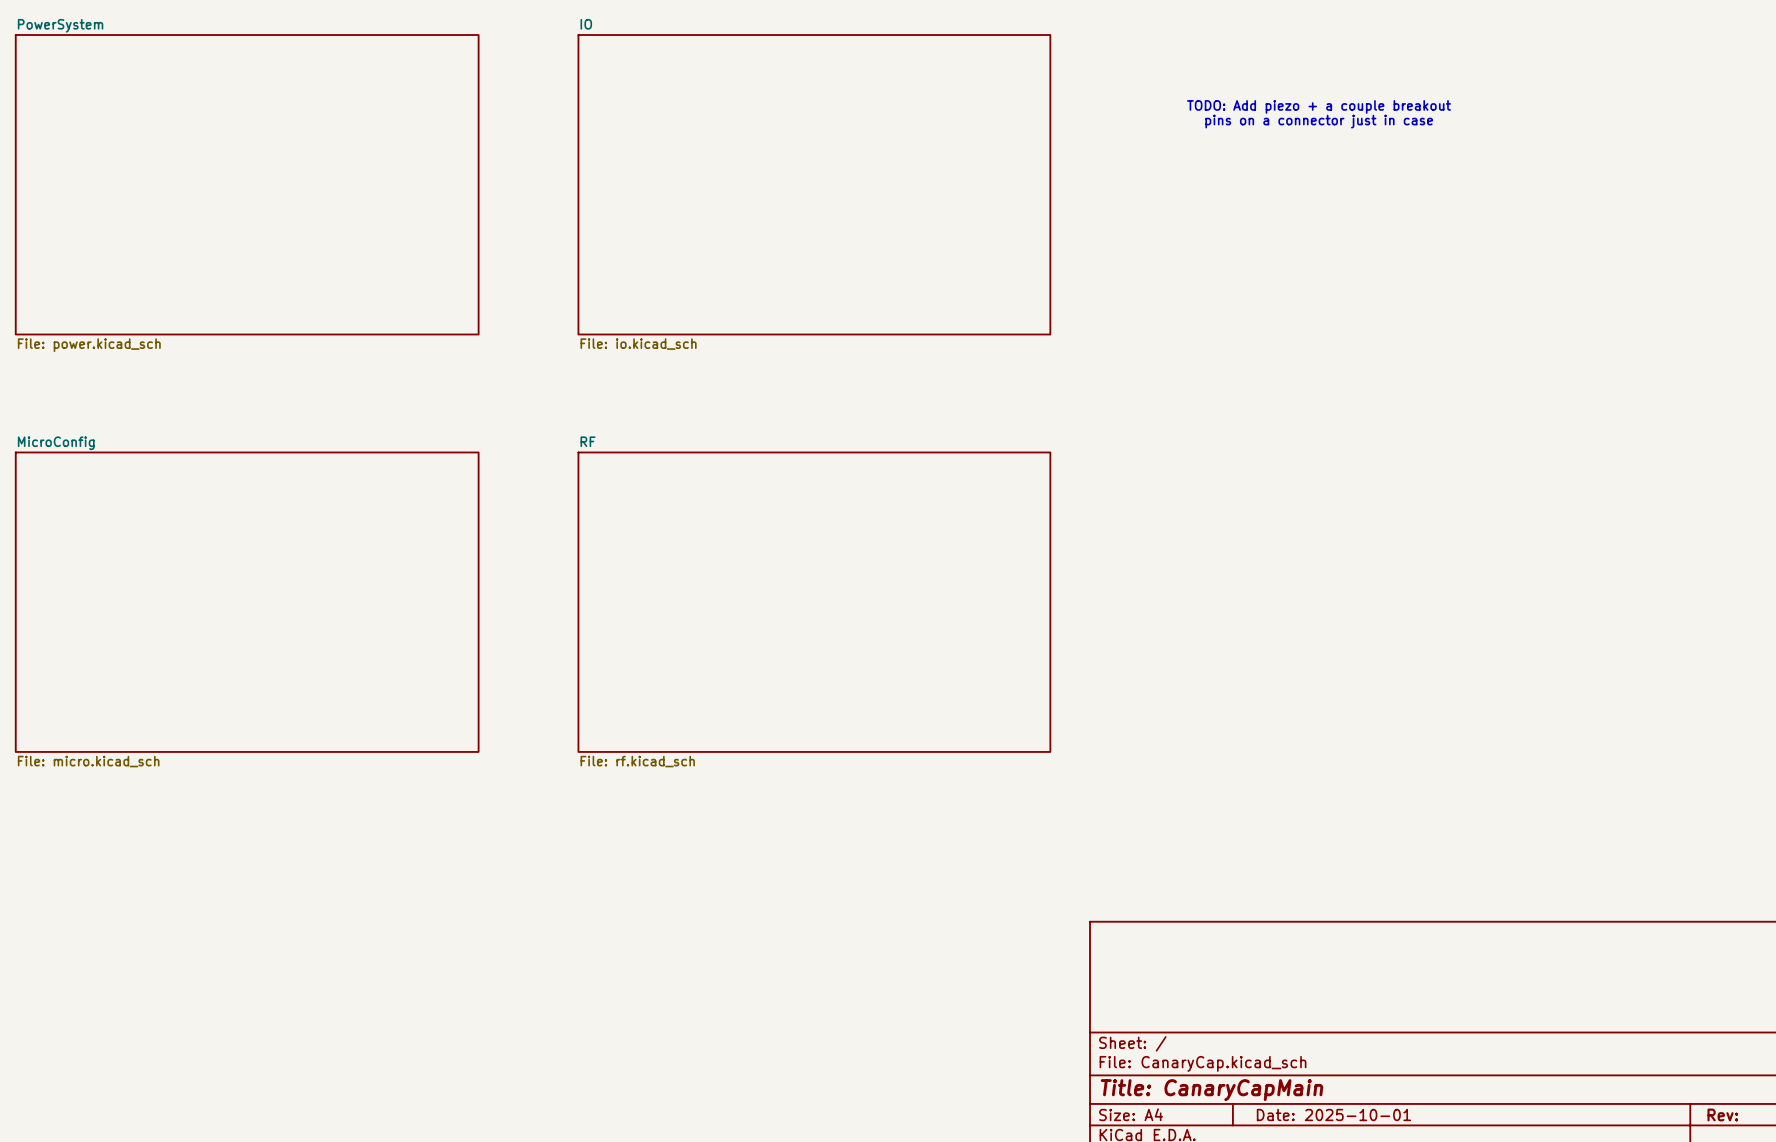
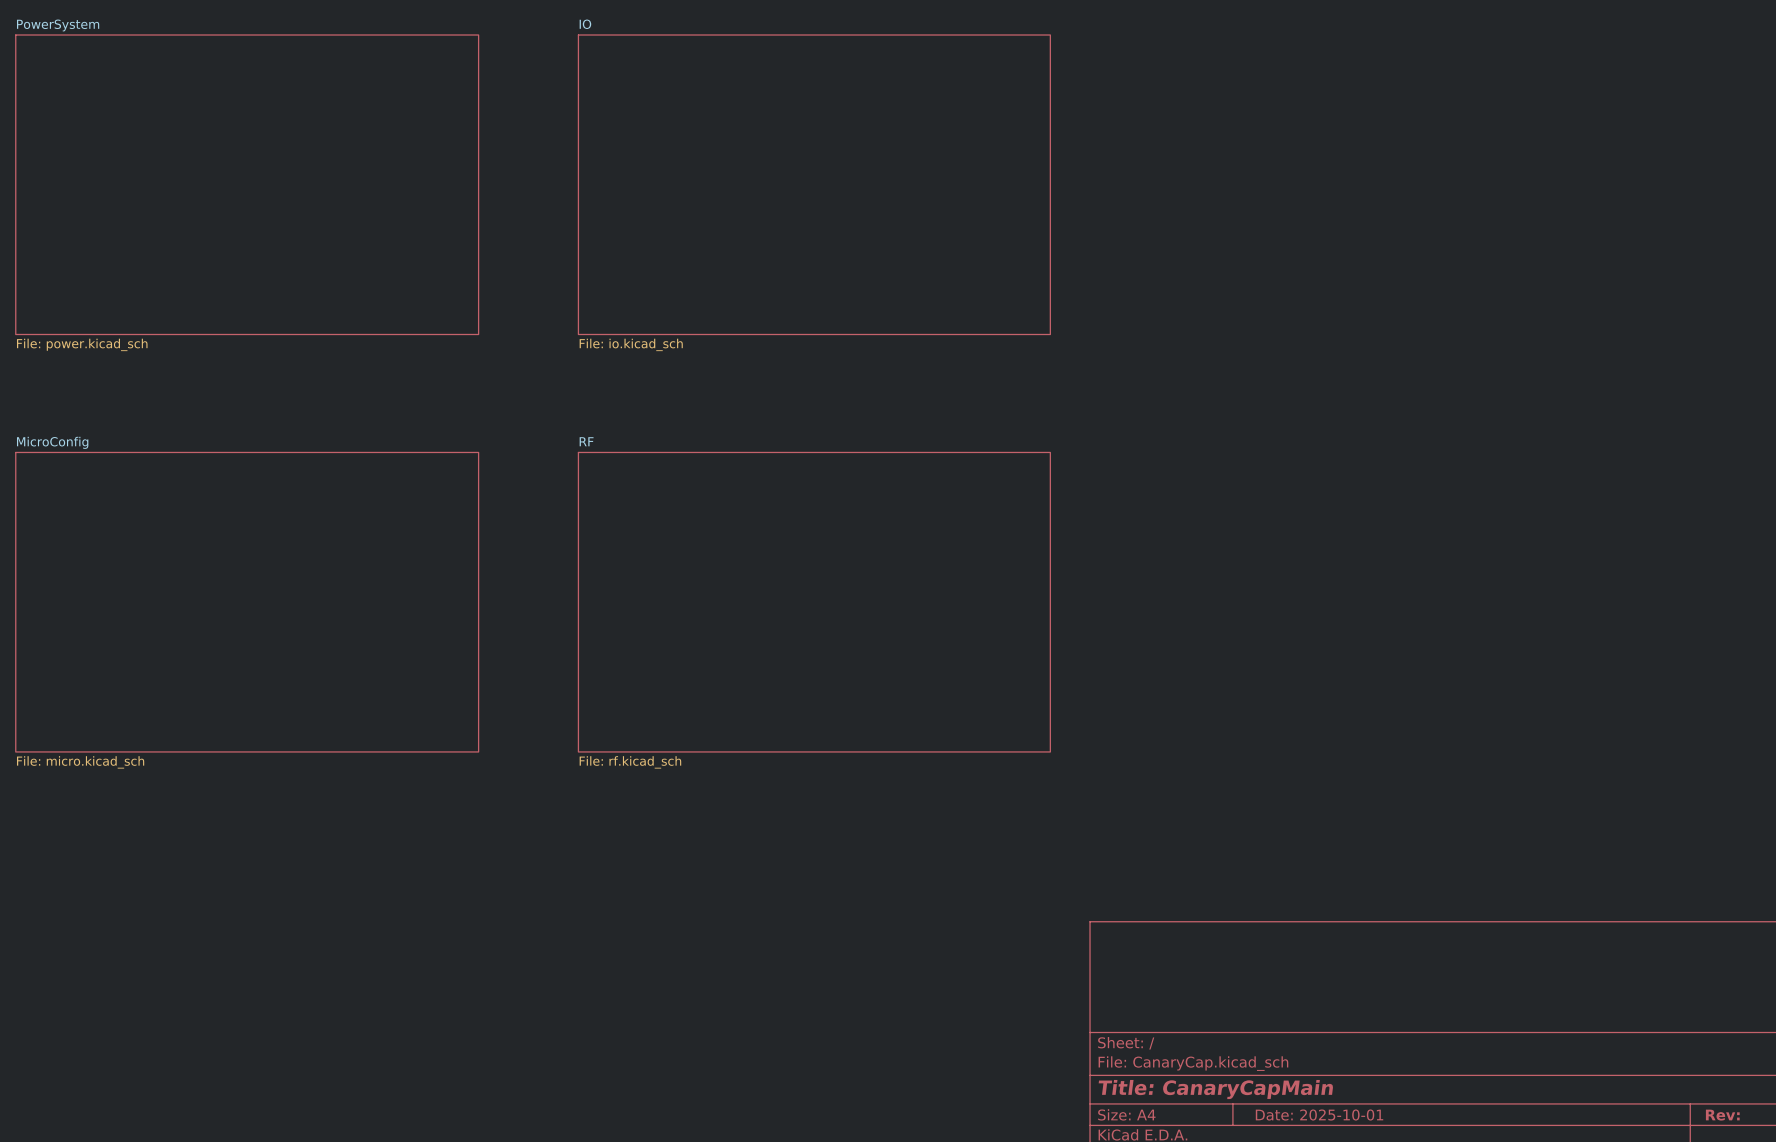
text: TODO: Add piezo + a couple breakout (1318, 106) -> none
text: pins on a connector just in case (1319, 121) -> none

